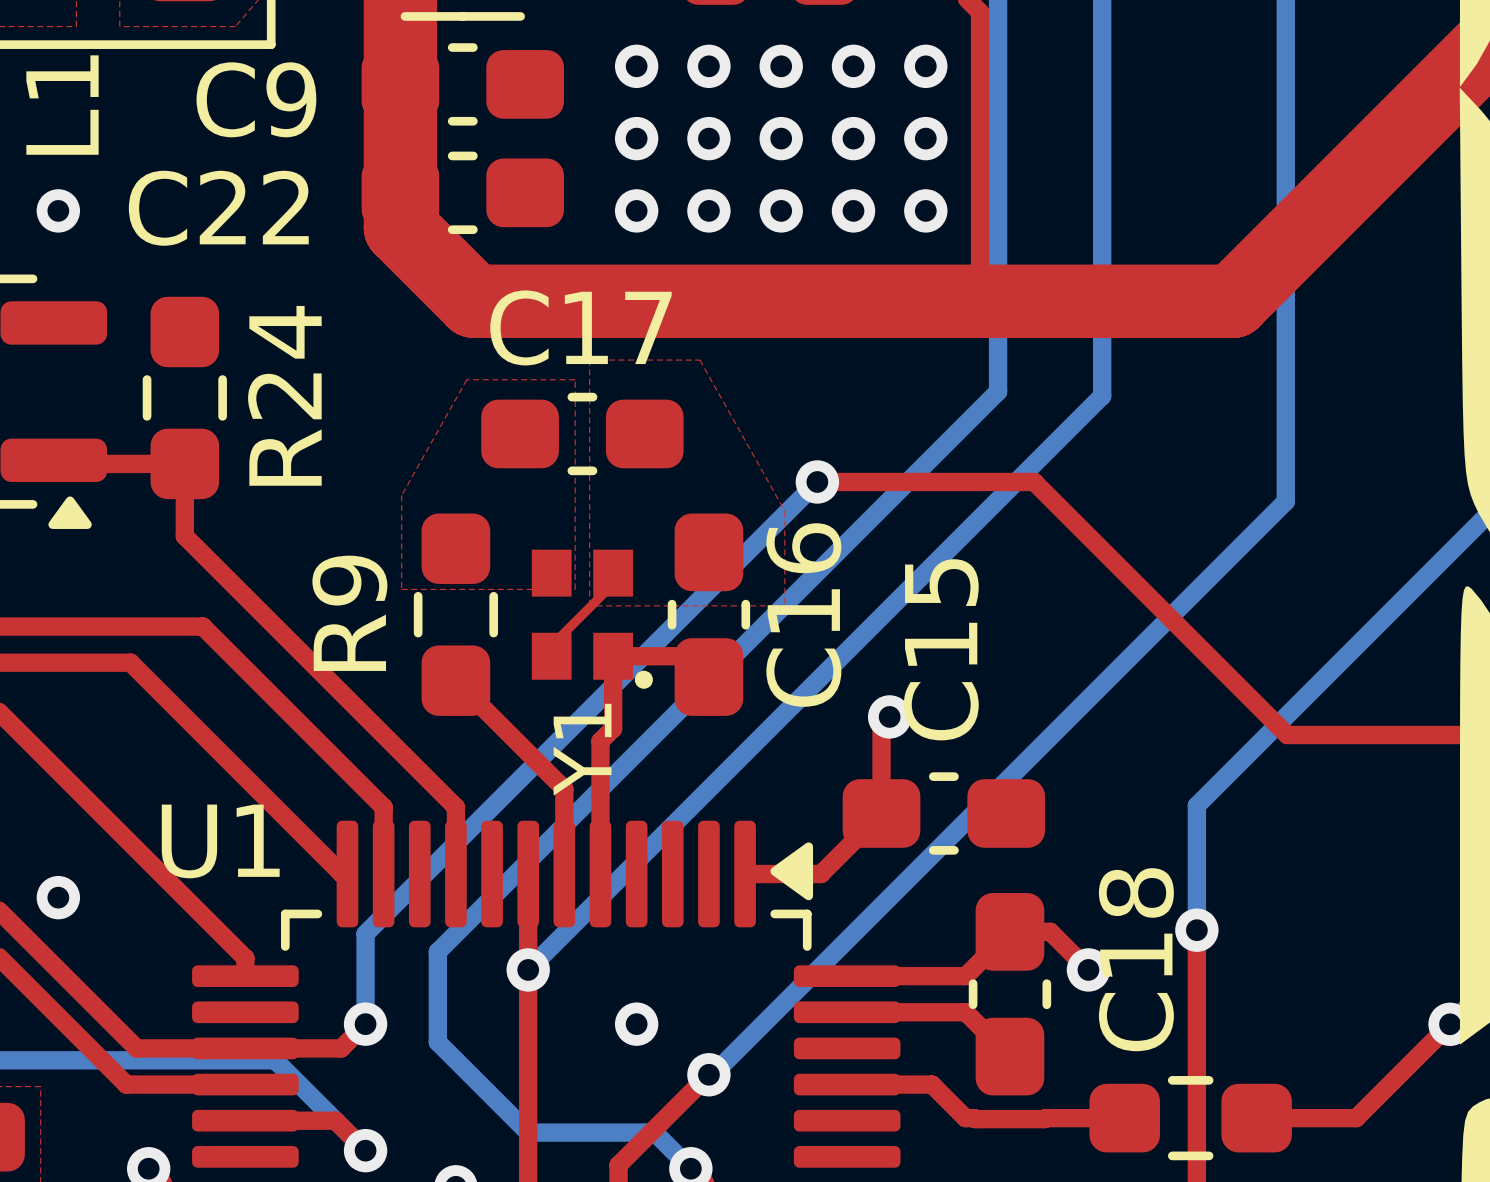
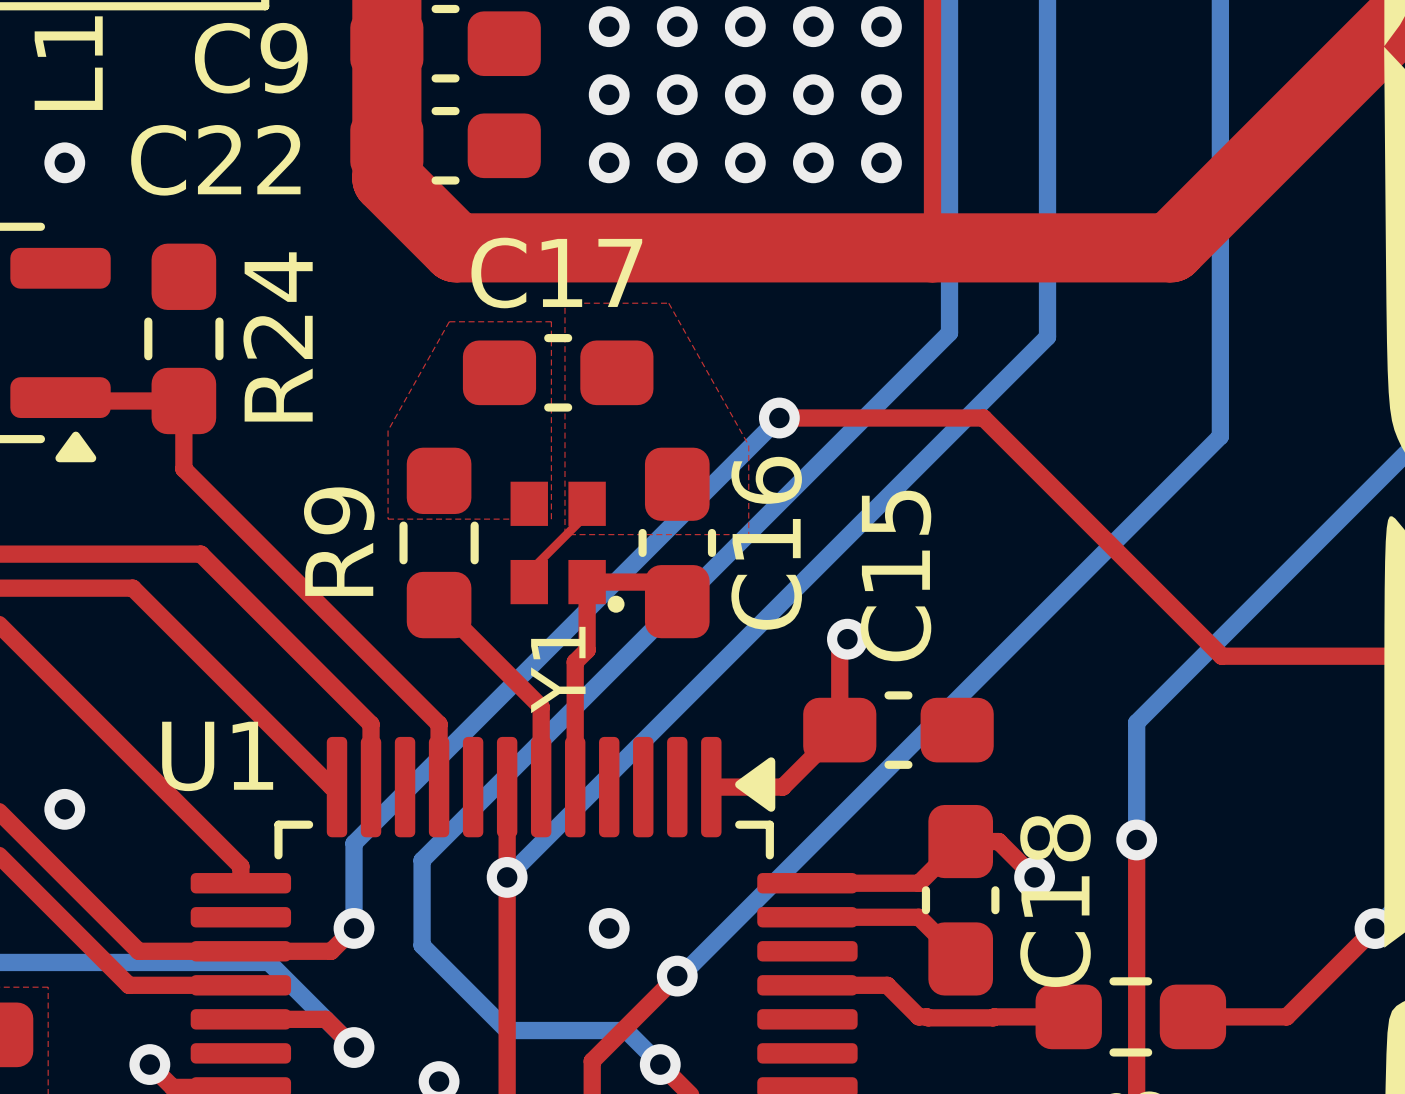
C18 name position: C18 (1136, 959) -> C18 (1055, 900)

